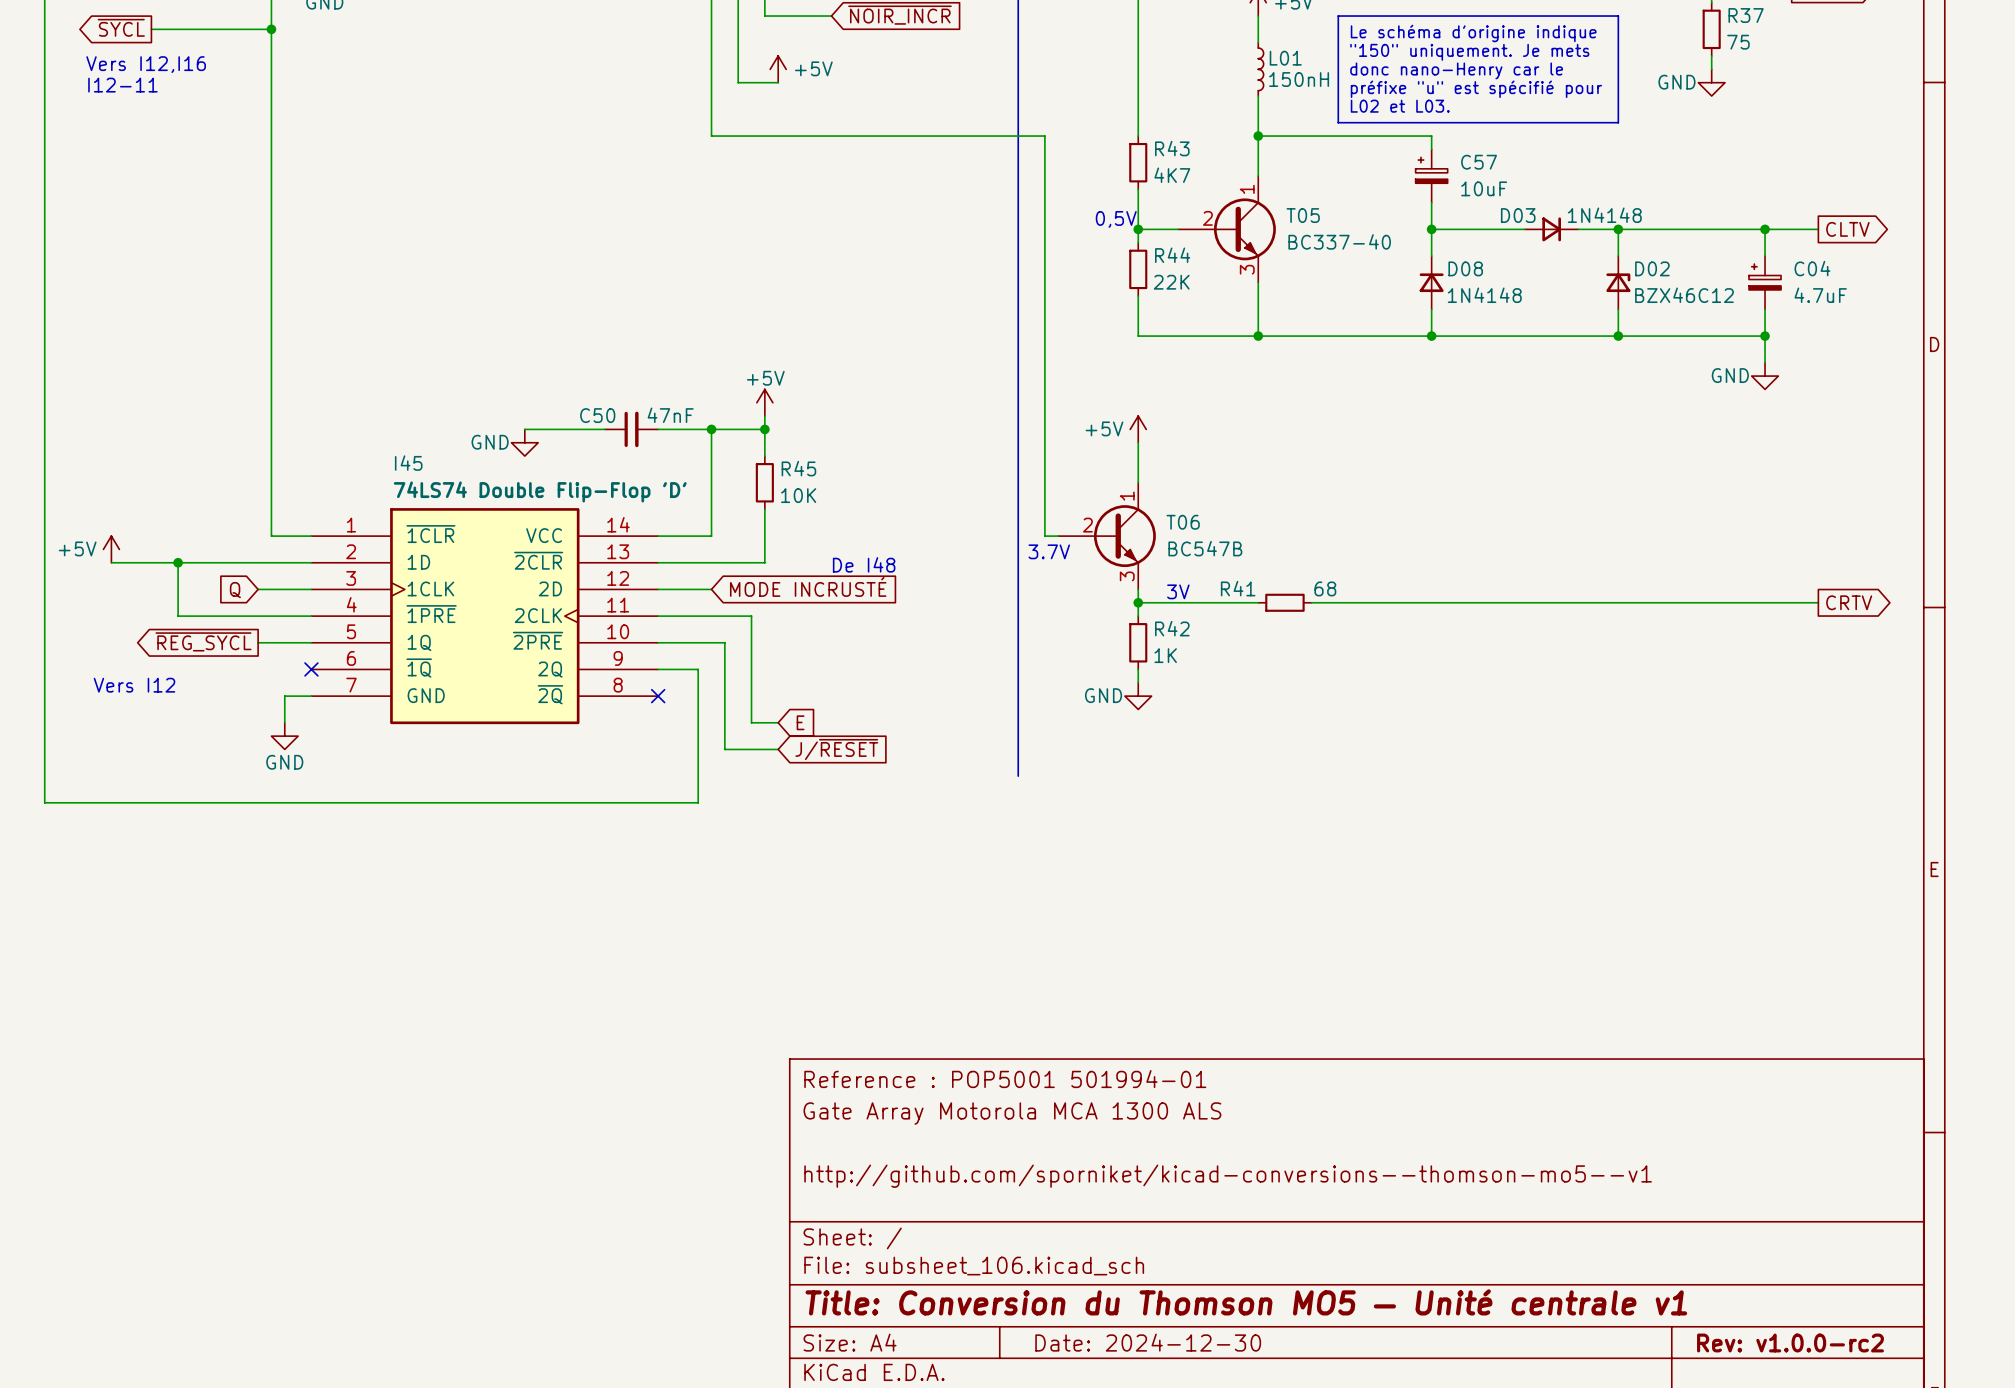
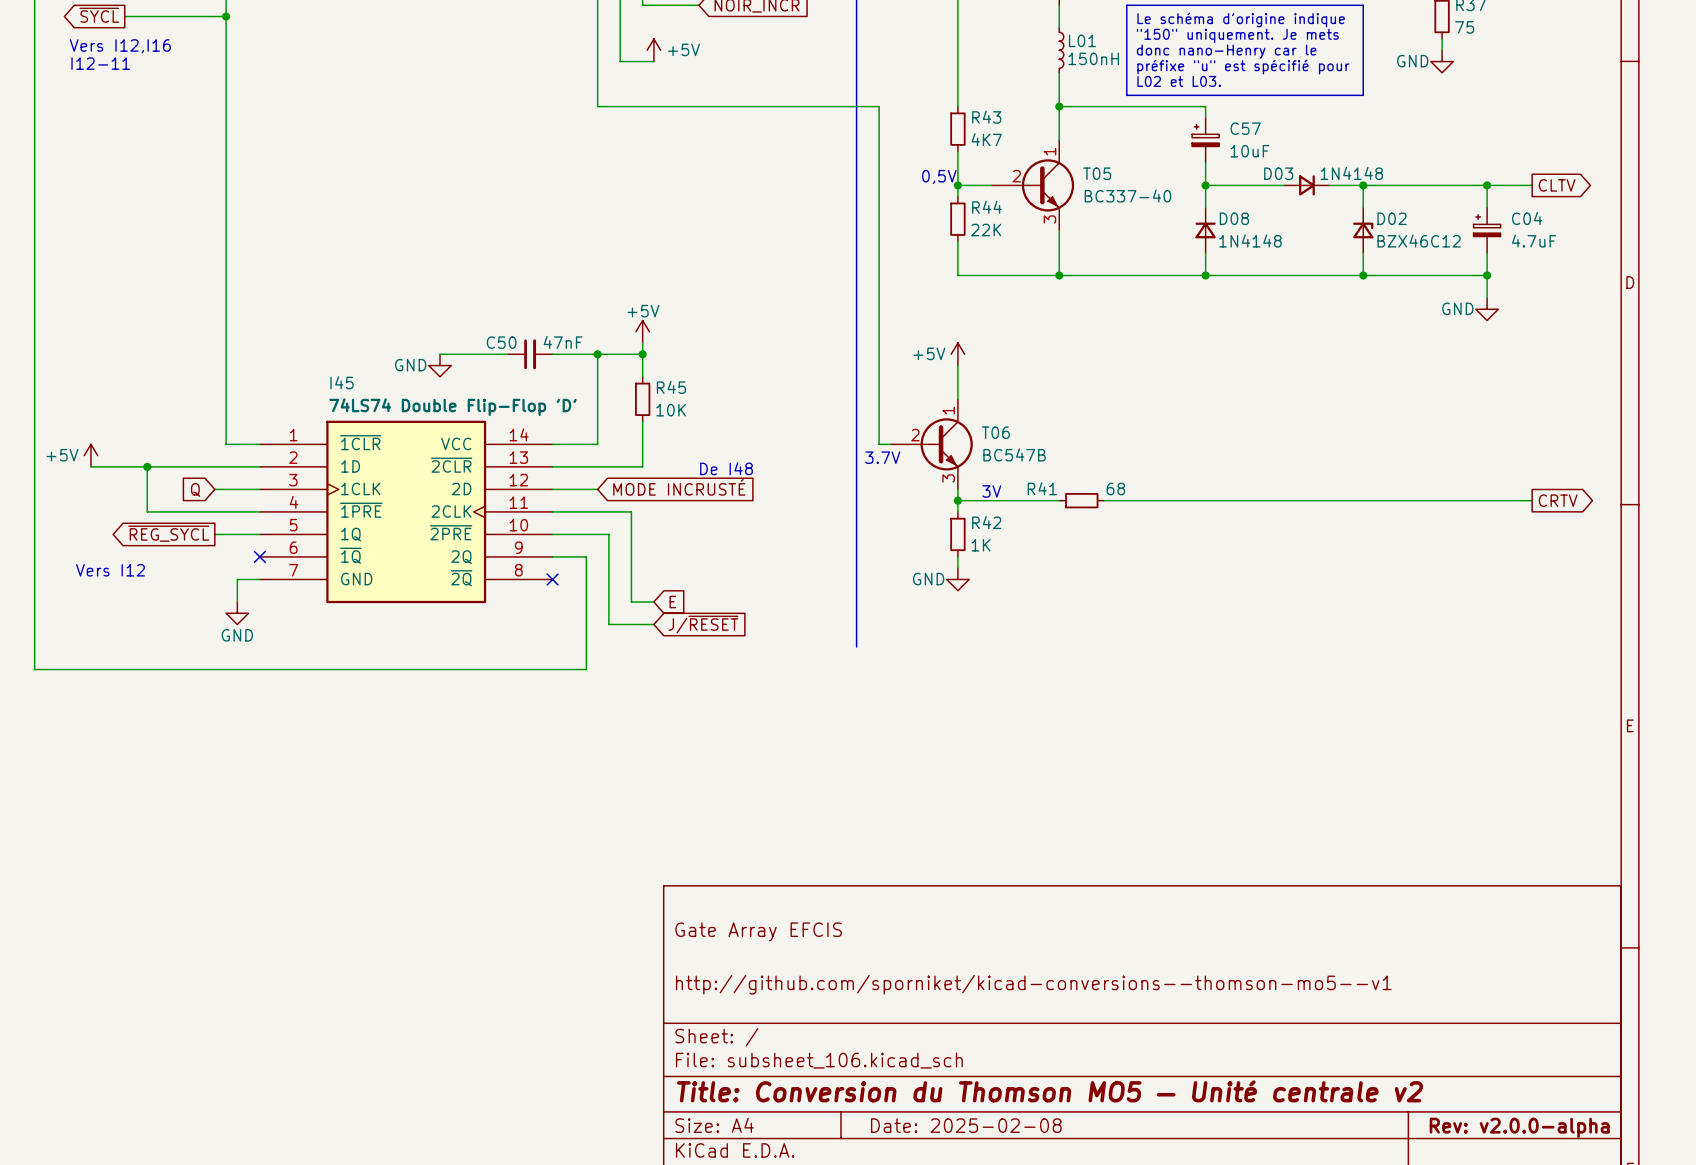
title block: Reference : POP5001 501994-01 (1005, 1079) -> none
title block: Gate Array Motorola MCA 1300 ALS (1012, 1113) -> Gate Array EFCIS (758, 931)
title block: Title: Conversion du Thomson MO5 — Unité centrale v1 (1246, 1302) -> Title: Conversion du Thomson MO5 — Unité centrale v2 (1050, 1091)
title block: Date: 2024-12-30 (1148, 1342) -> Date: 2025-02-08 (966, 1125)
title block: Rev: v1.0.0-rc2 (1790, 1342) -> Rev: v2.0.0-alpha (1519, 1127)

